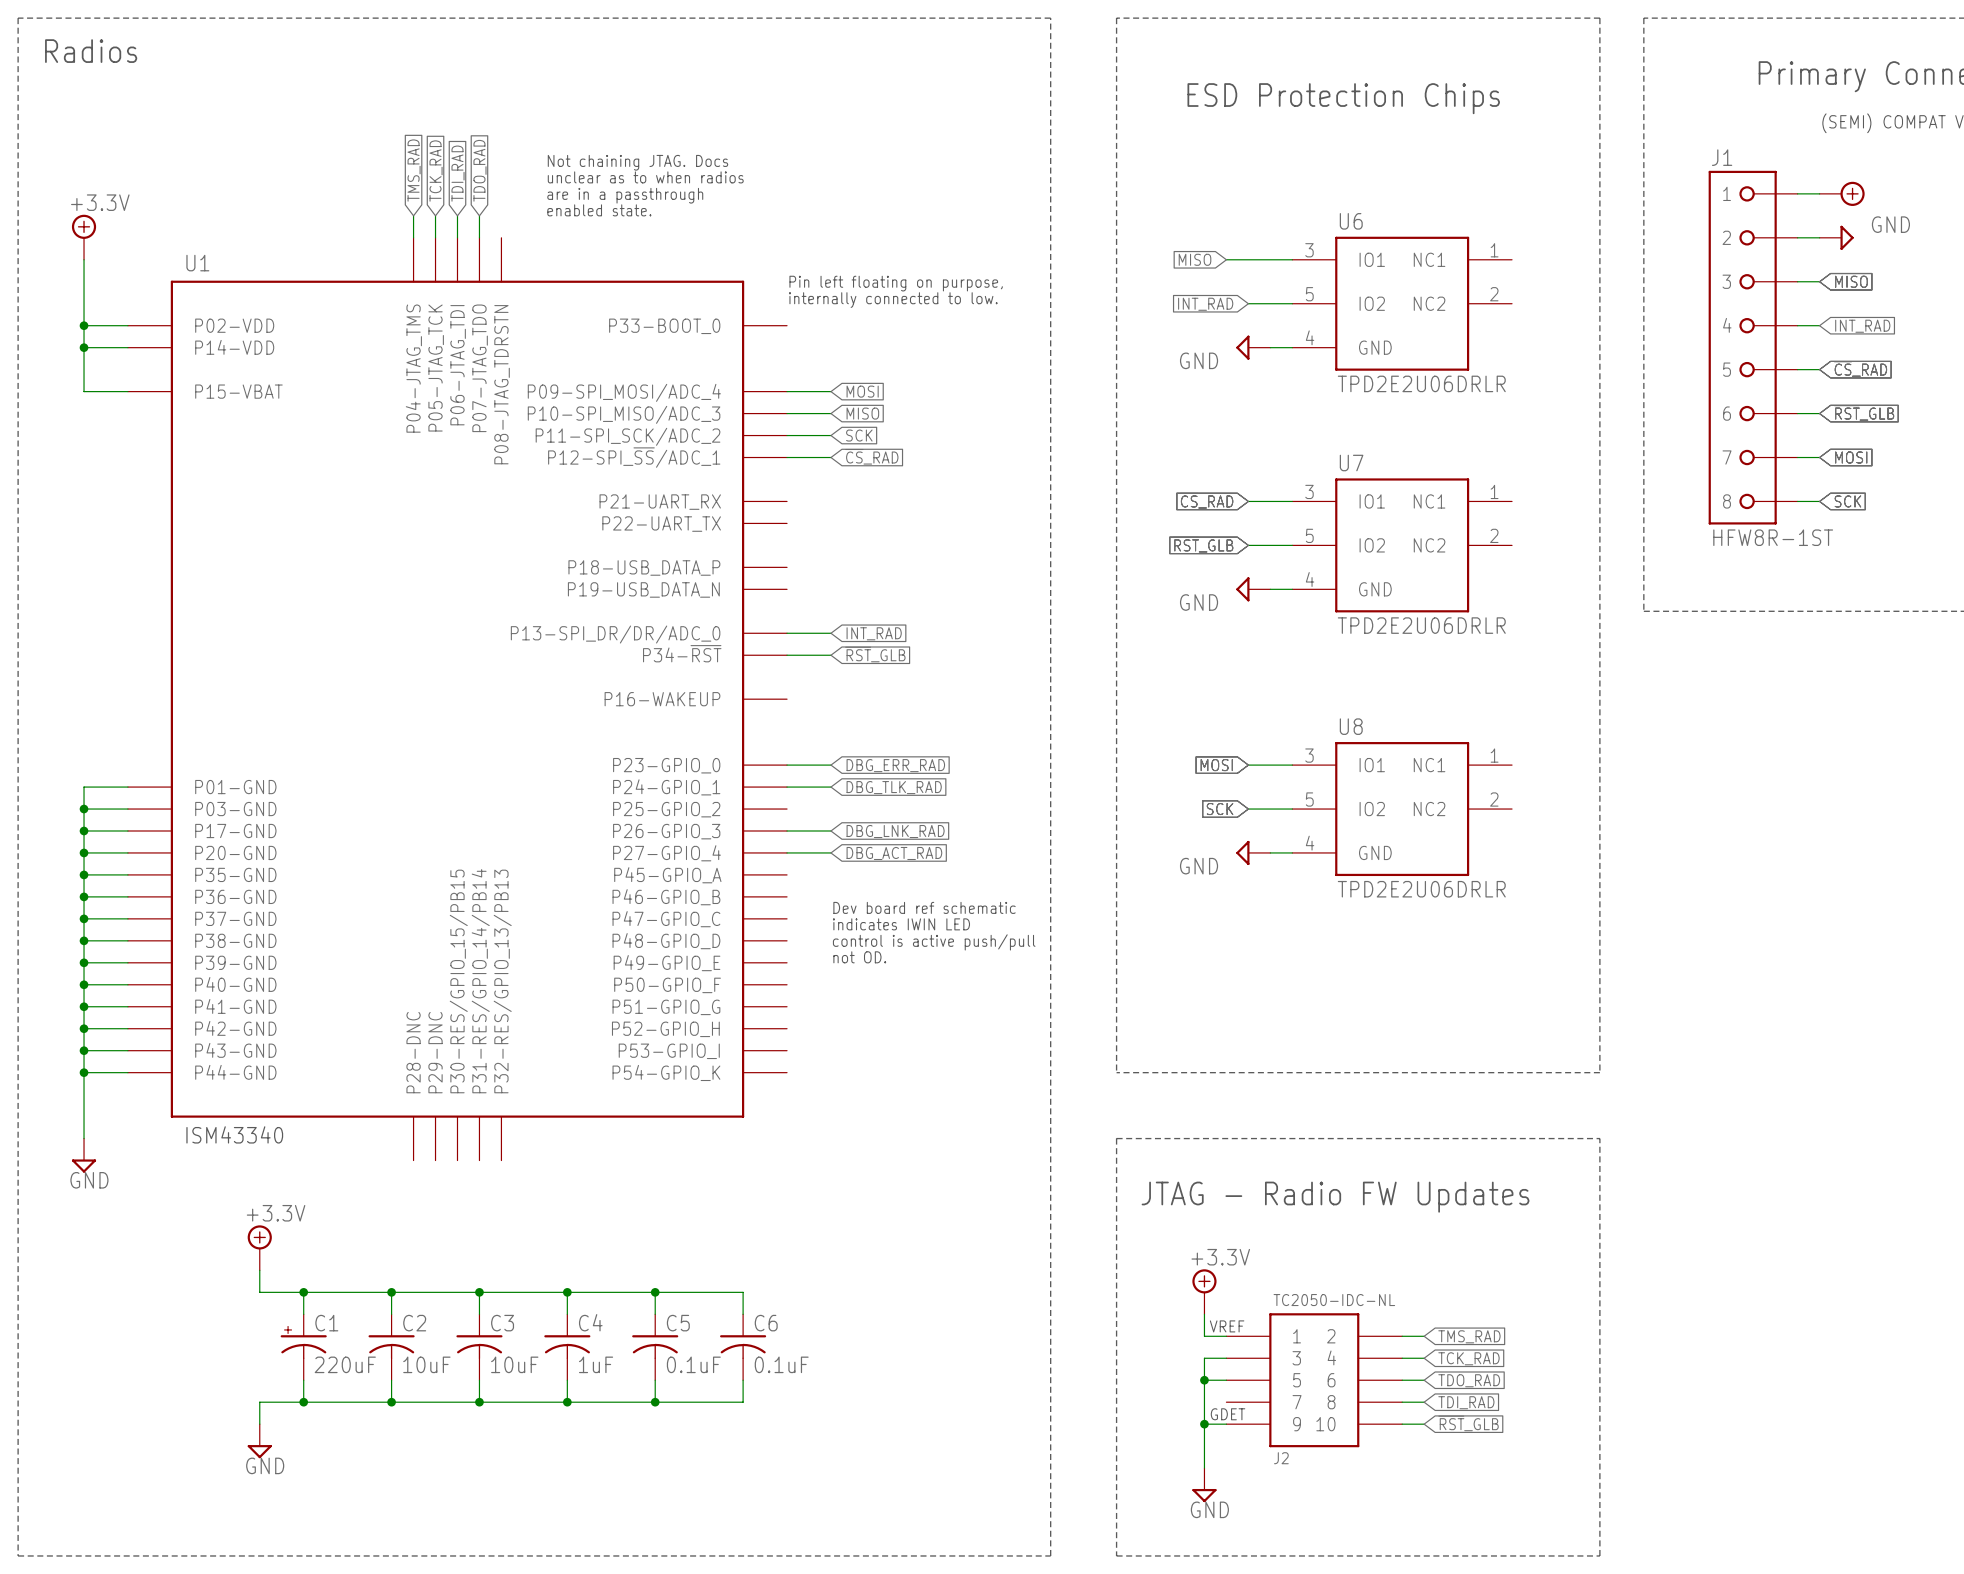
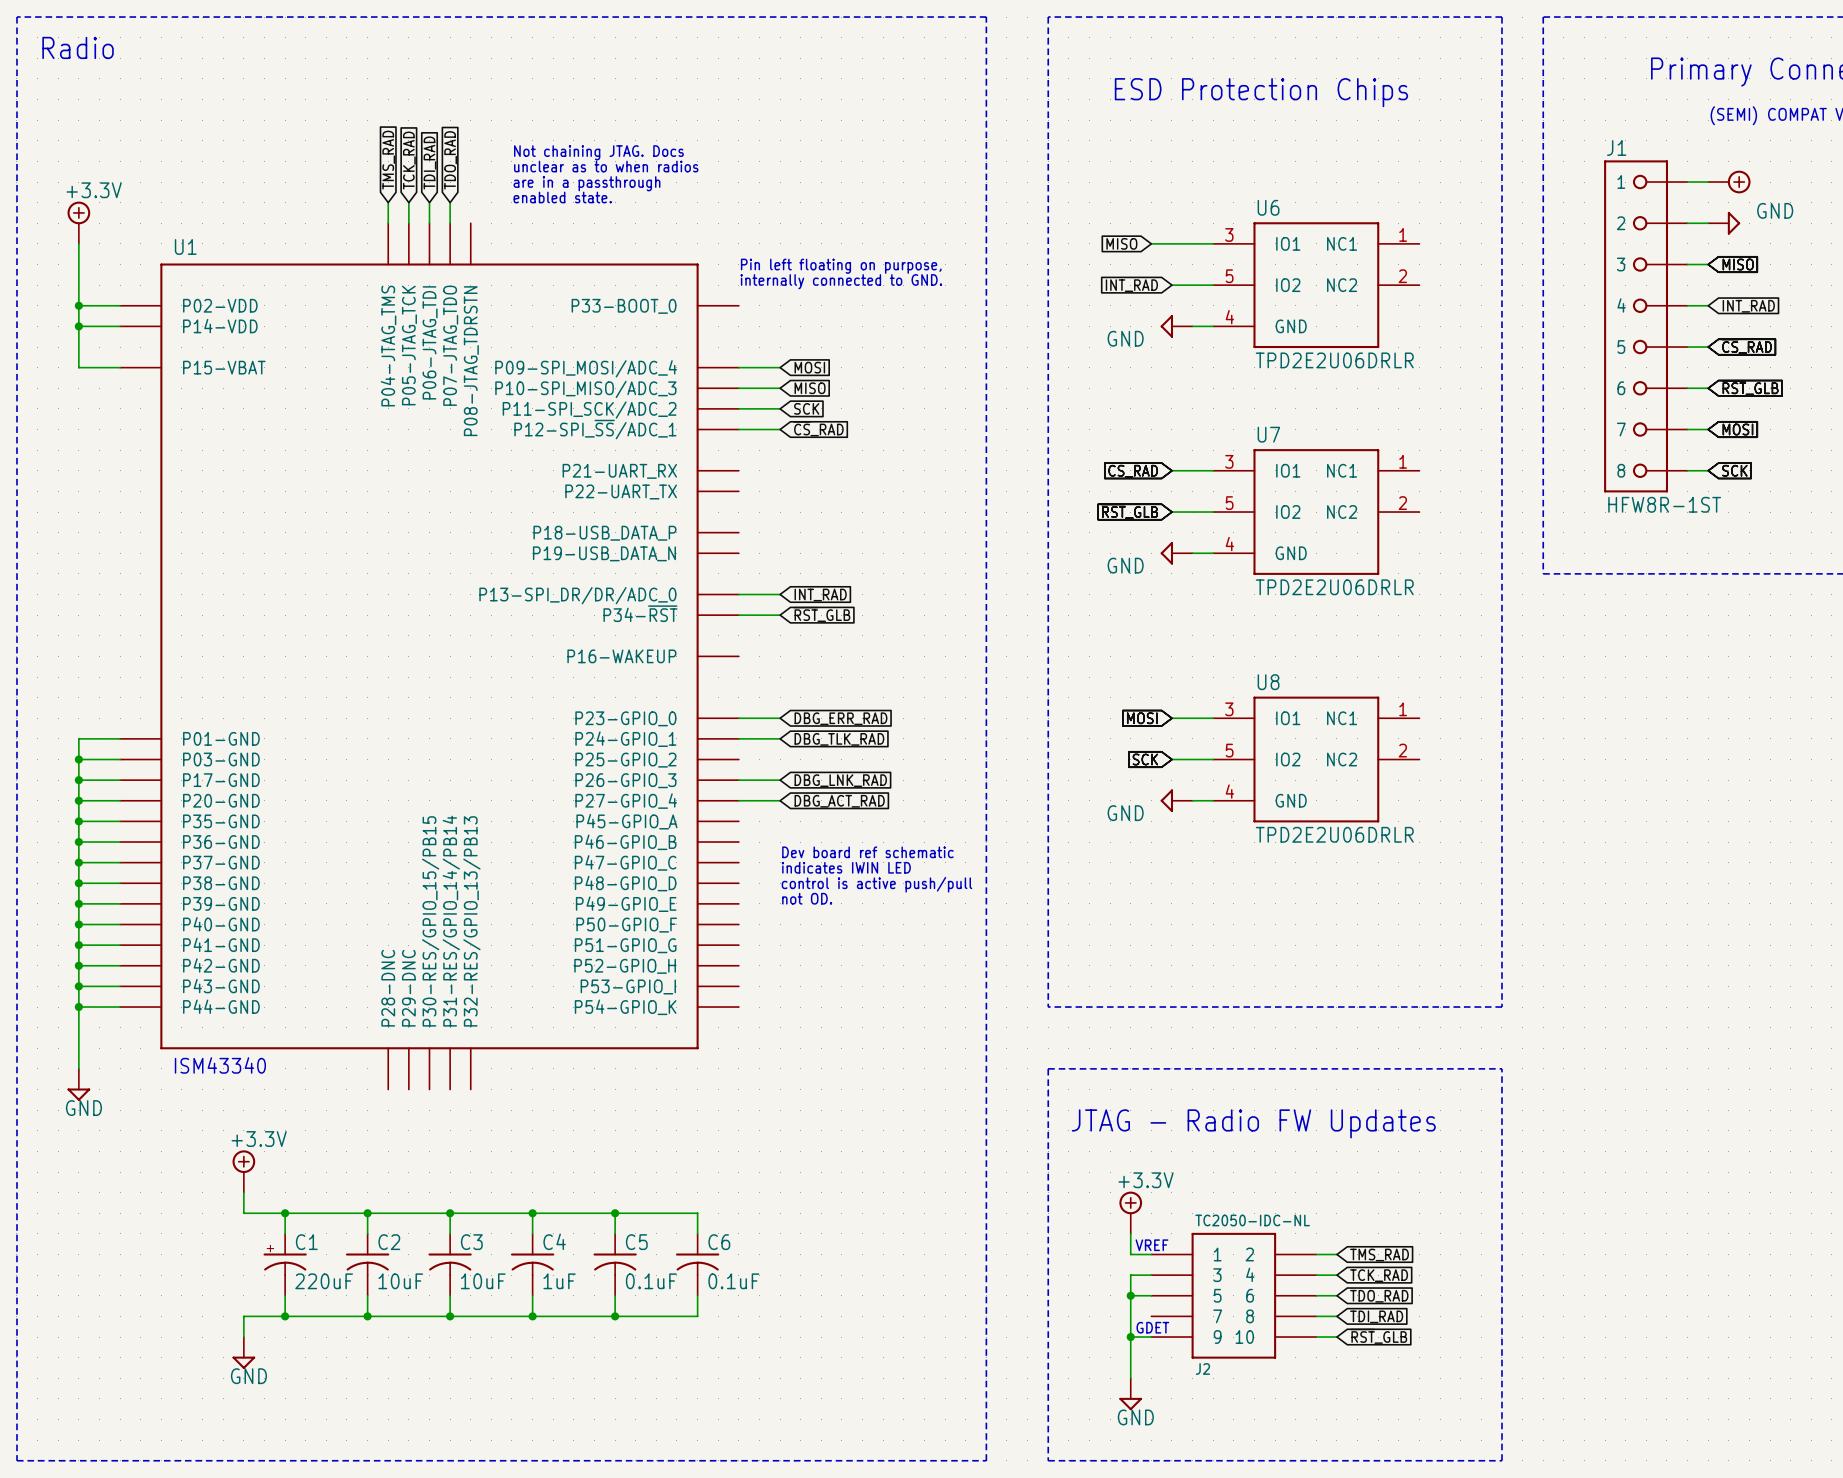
text: Radios (91, 51) -> Radio (78, 47)
text: internally connected to low. (893, 300) -> internally connected to GND. (841, 281)

